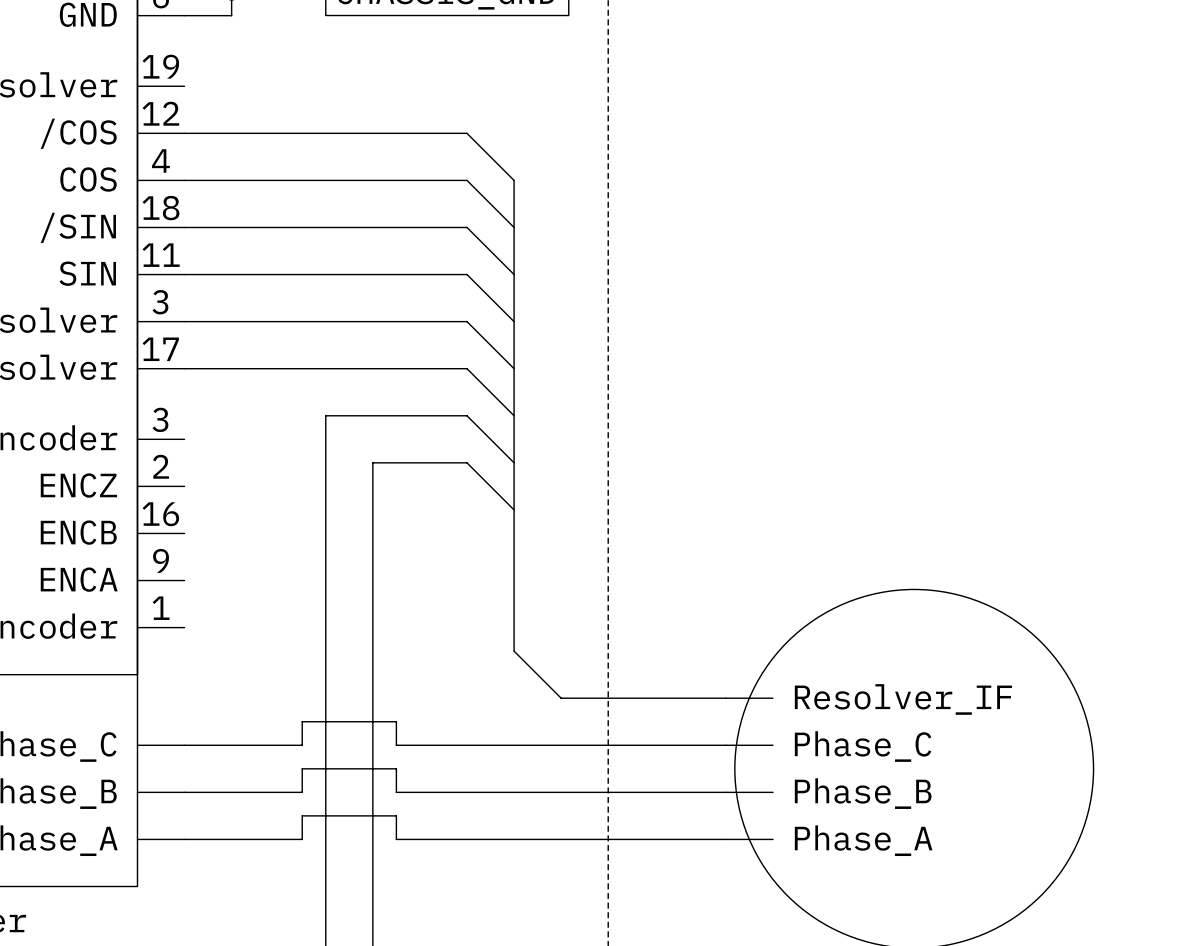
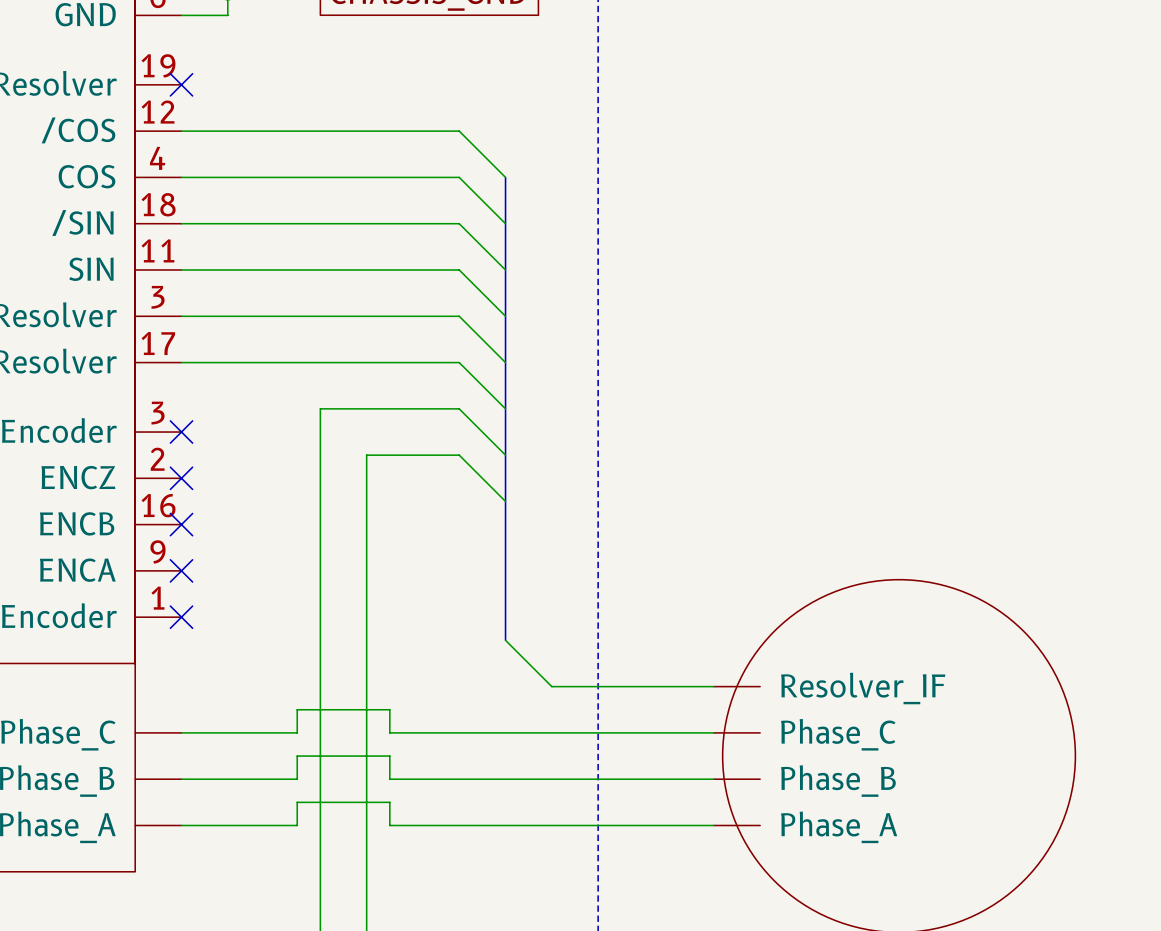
no-connect mark: none -> (181, 84)
no-connect mark: none -> (181, 432)
no-connect mark: none -> (181, 478)
no-connect mark: none -> (181, 524)
no-connect mark: none -> (181, 570)
no-connect mark: none -> (181, 617)

